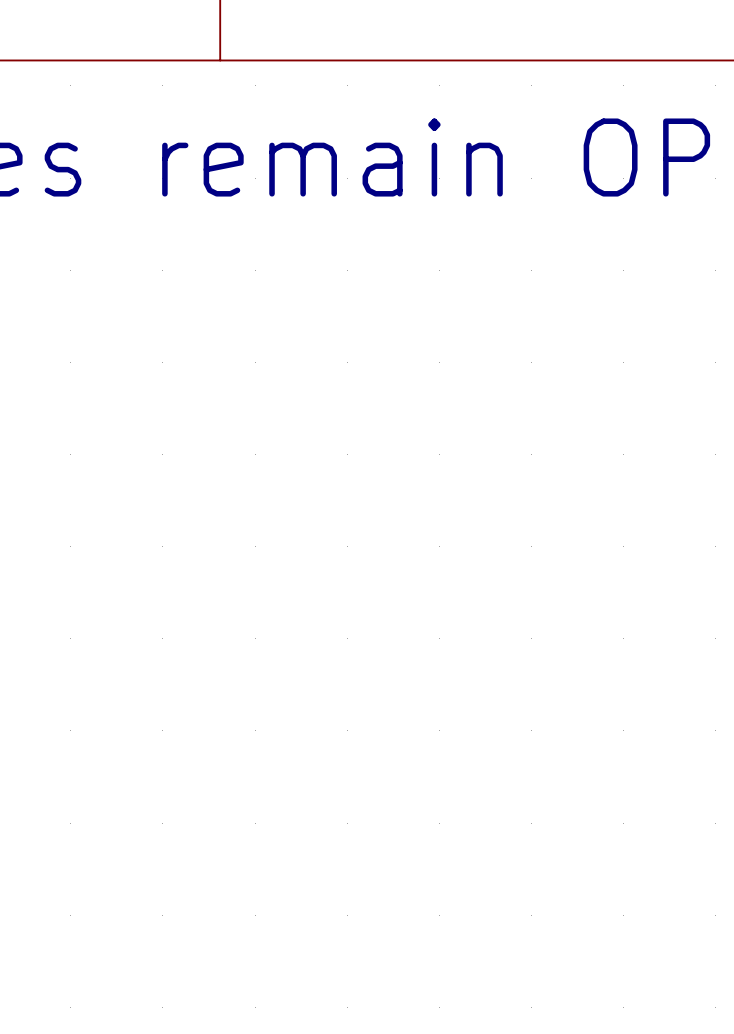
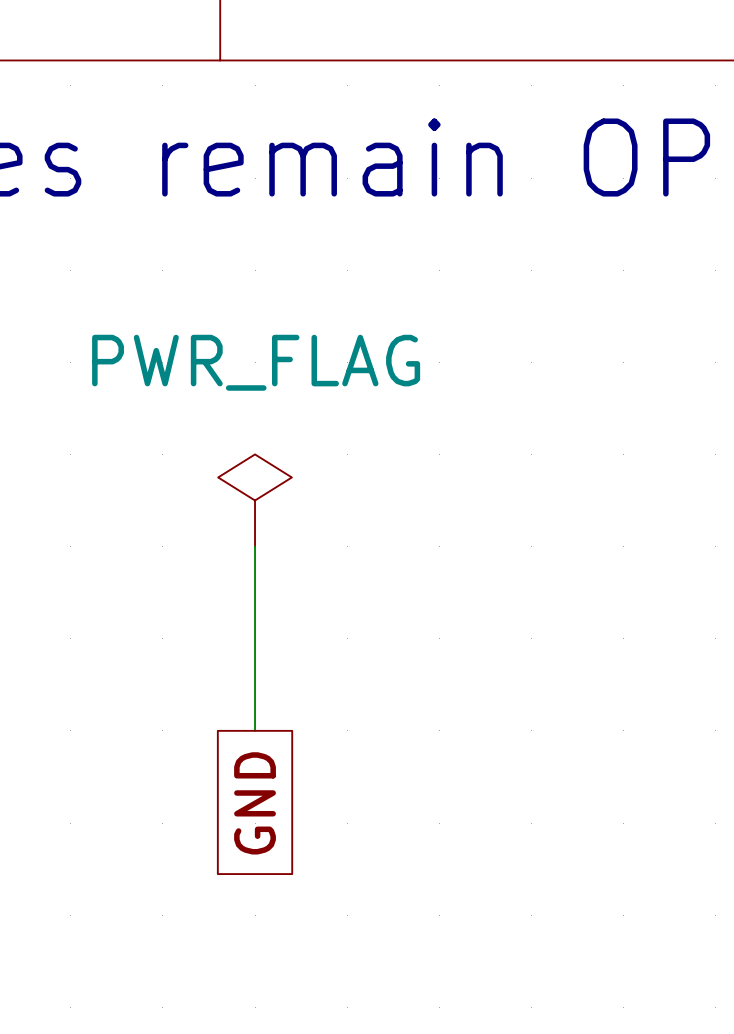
power symbol: none -> PWR_FLAG (255, 500)
wire: none -> (255, 546) (255, 730)
global label: none -> GND (255, 803)

